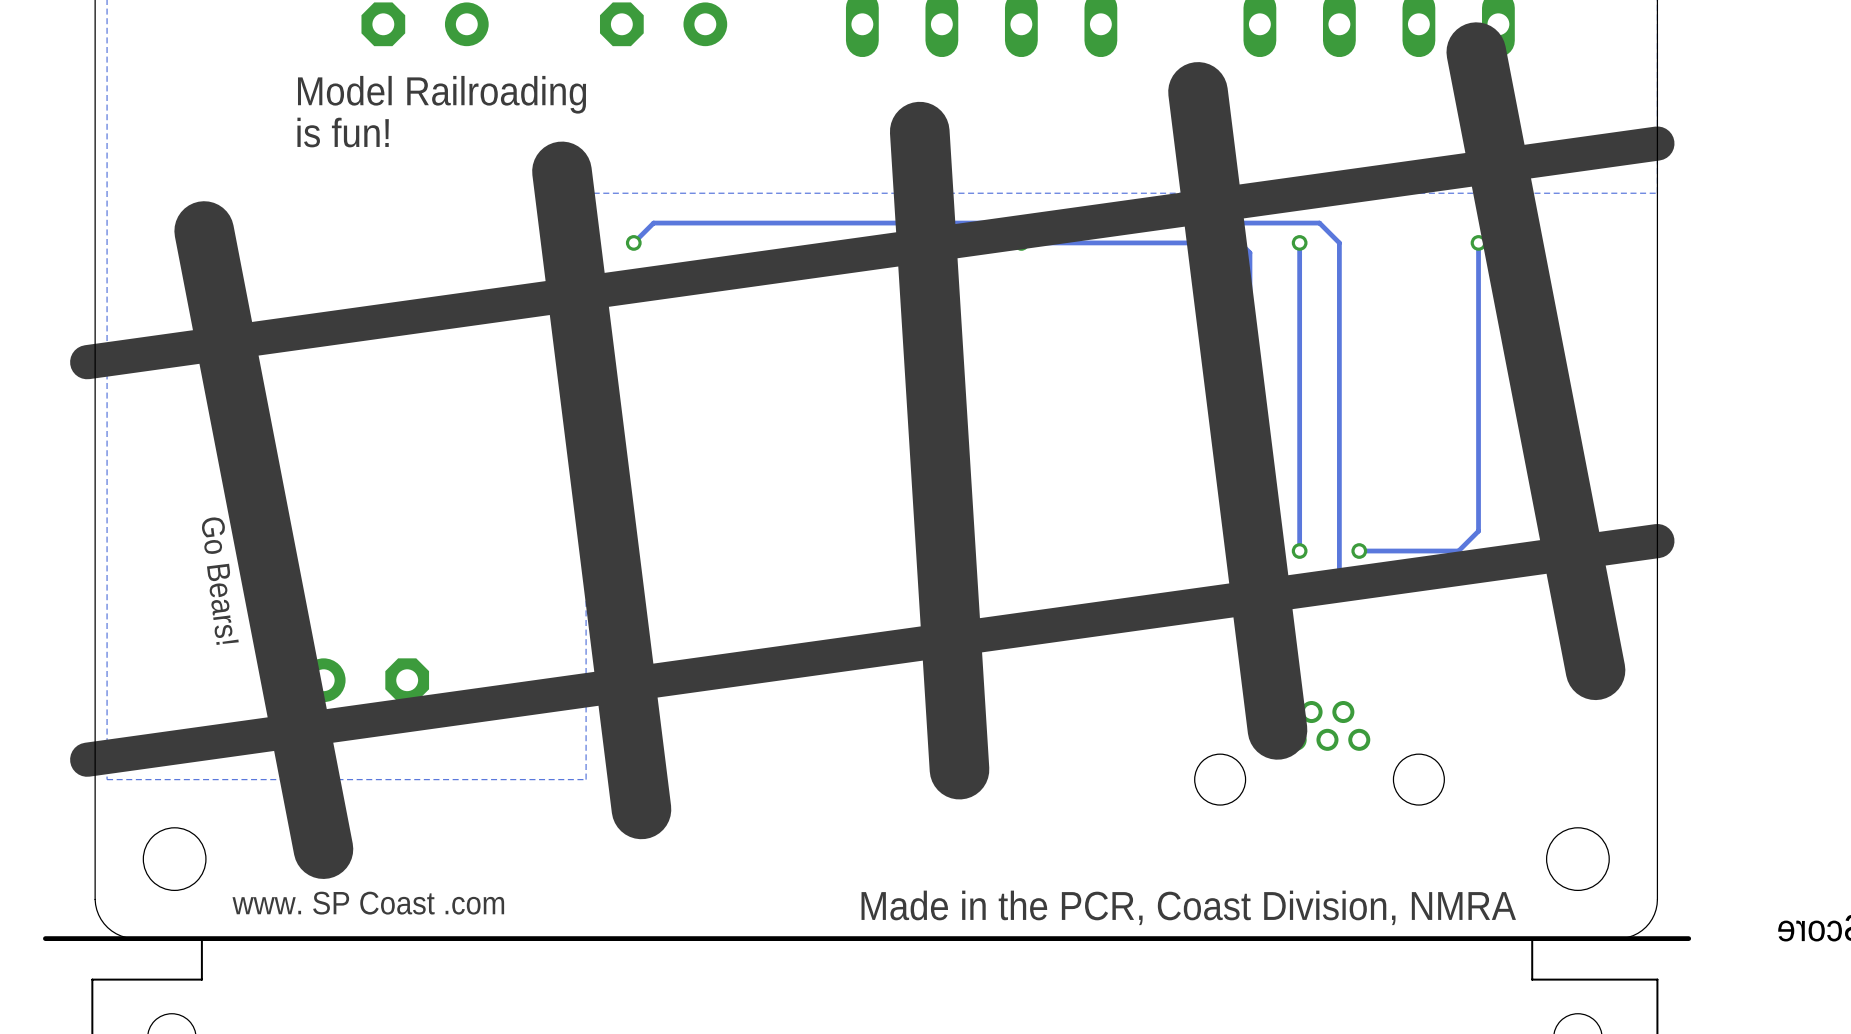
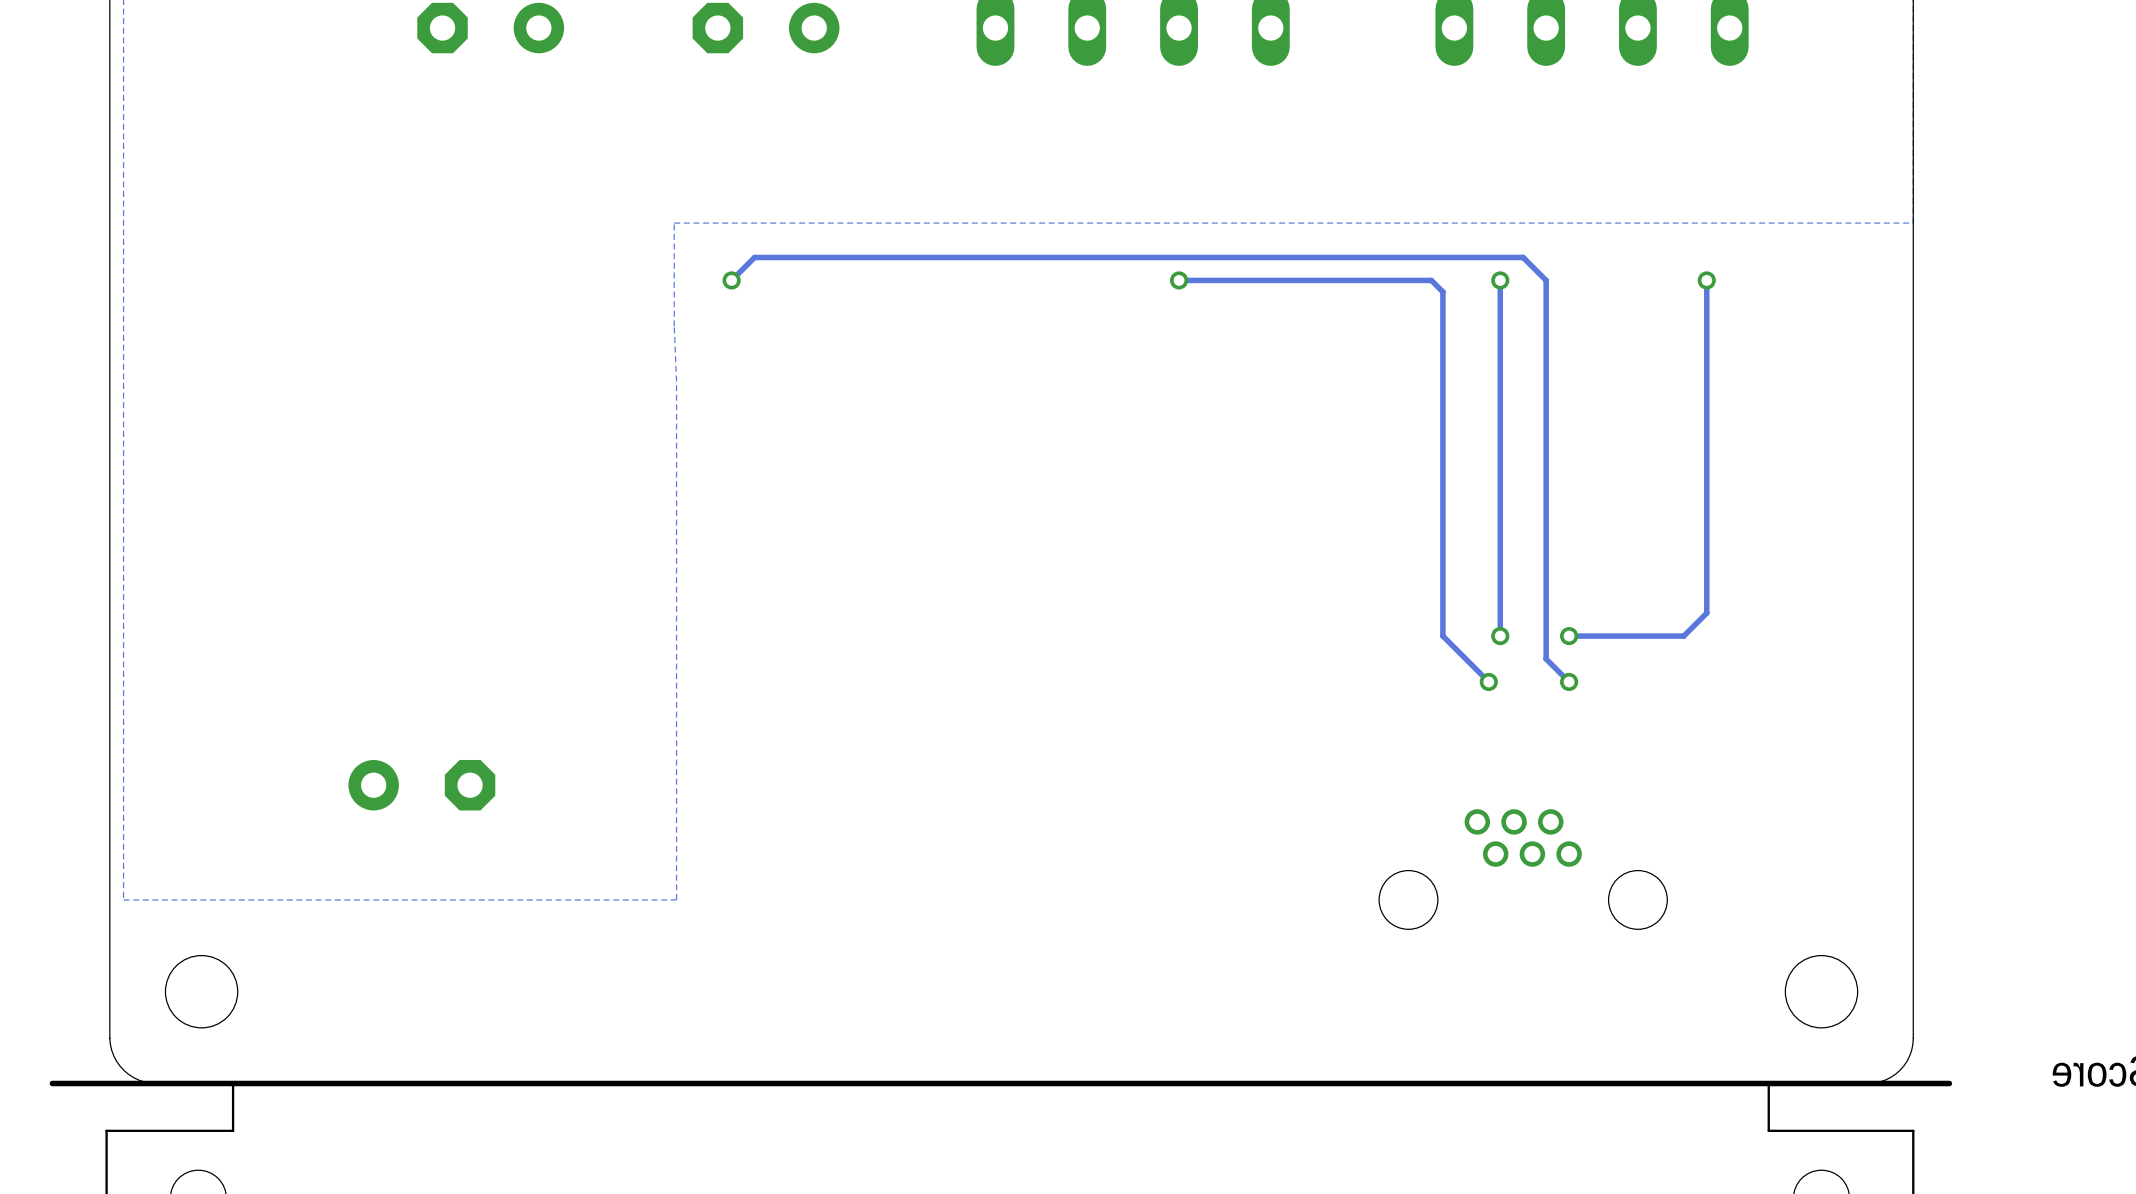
line: (1476, 52) (1595, 670) -> none
line: (1198, 91) (1277, 729) -> none
text: Model Railroading (442, 94) -> none
line: (919, 131) (959, 769) -> none
text: is fun! (343, 132) -> none
line: (1657, 143) (87, 362) -> none
line: (561, 171) (641, 809) -> none
line: (204, 231) (323, 849) -> none
line: (1657, 541) (87, 759) -> none
text: Go Bears! (220, 580) -> none
text: www. SP Coast .com (368, 903) -> none
text: Made in the PCR, Coast Division, NMRA (1188, 907) -> none

